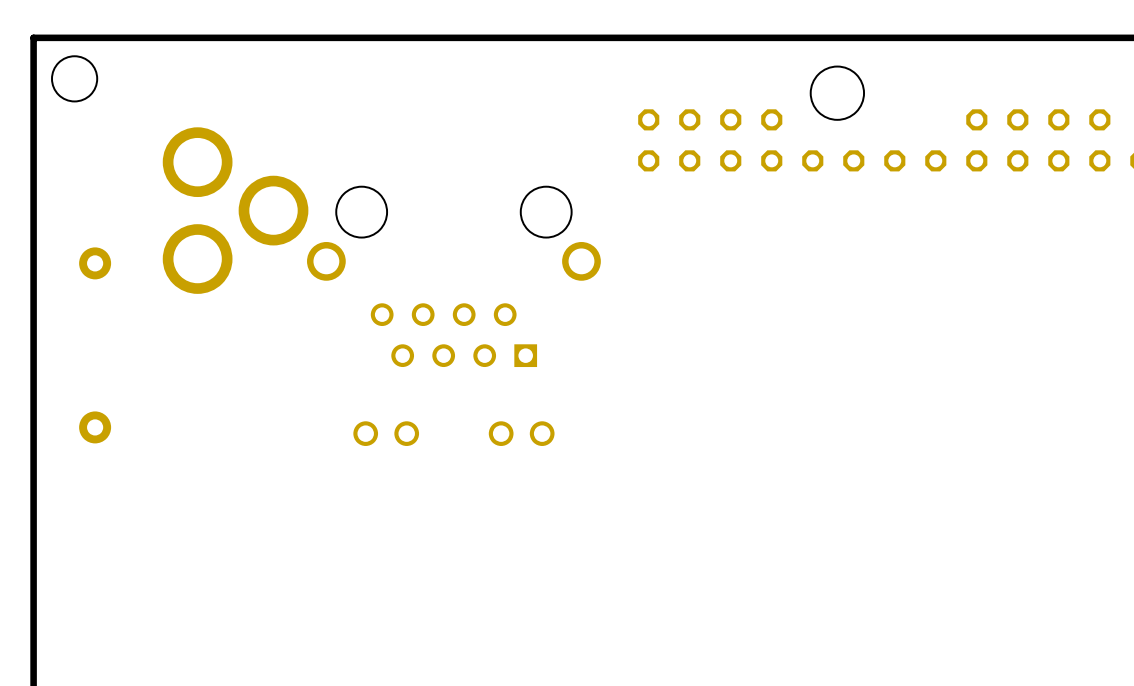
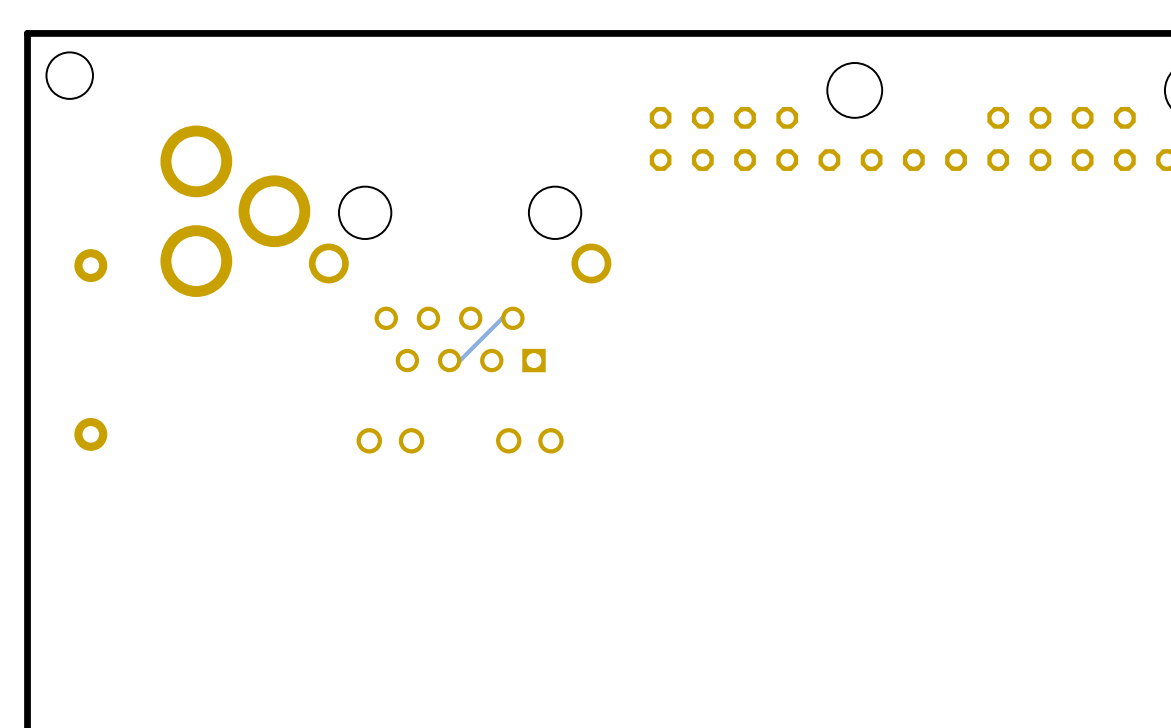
track: none -> (512, 318) (502, 318) (460, 360) (449, 360)

